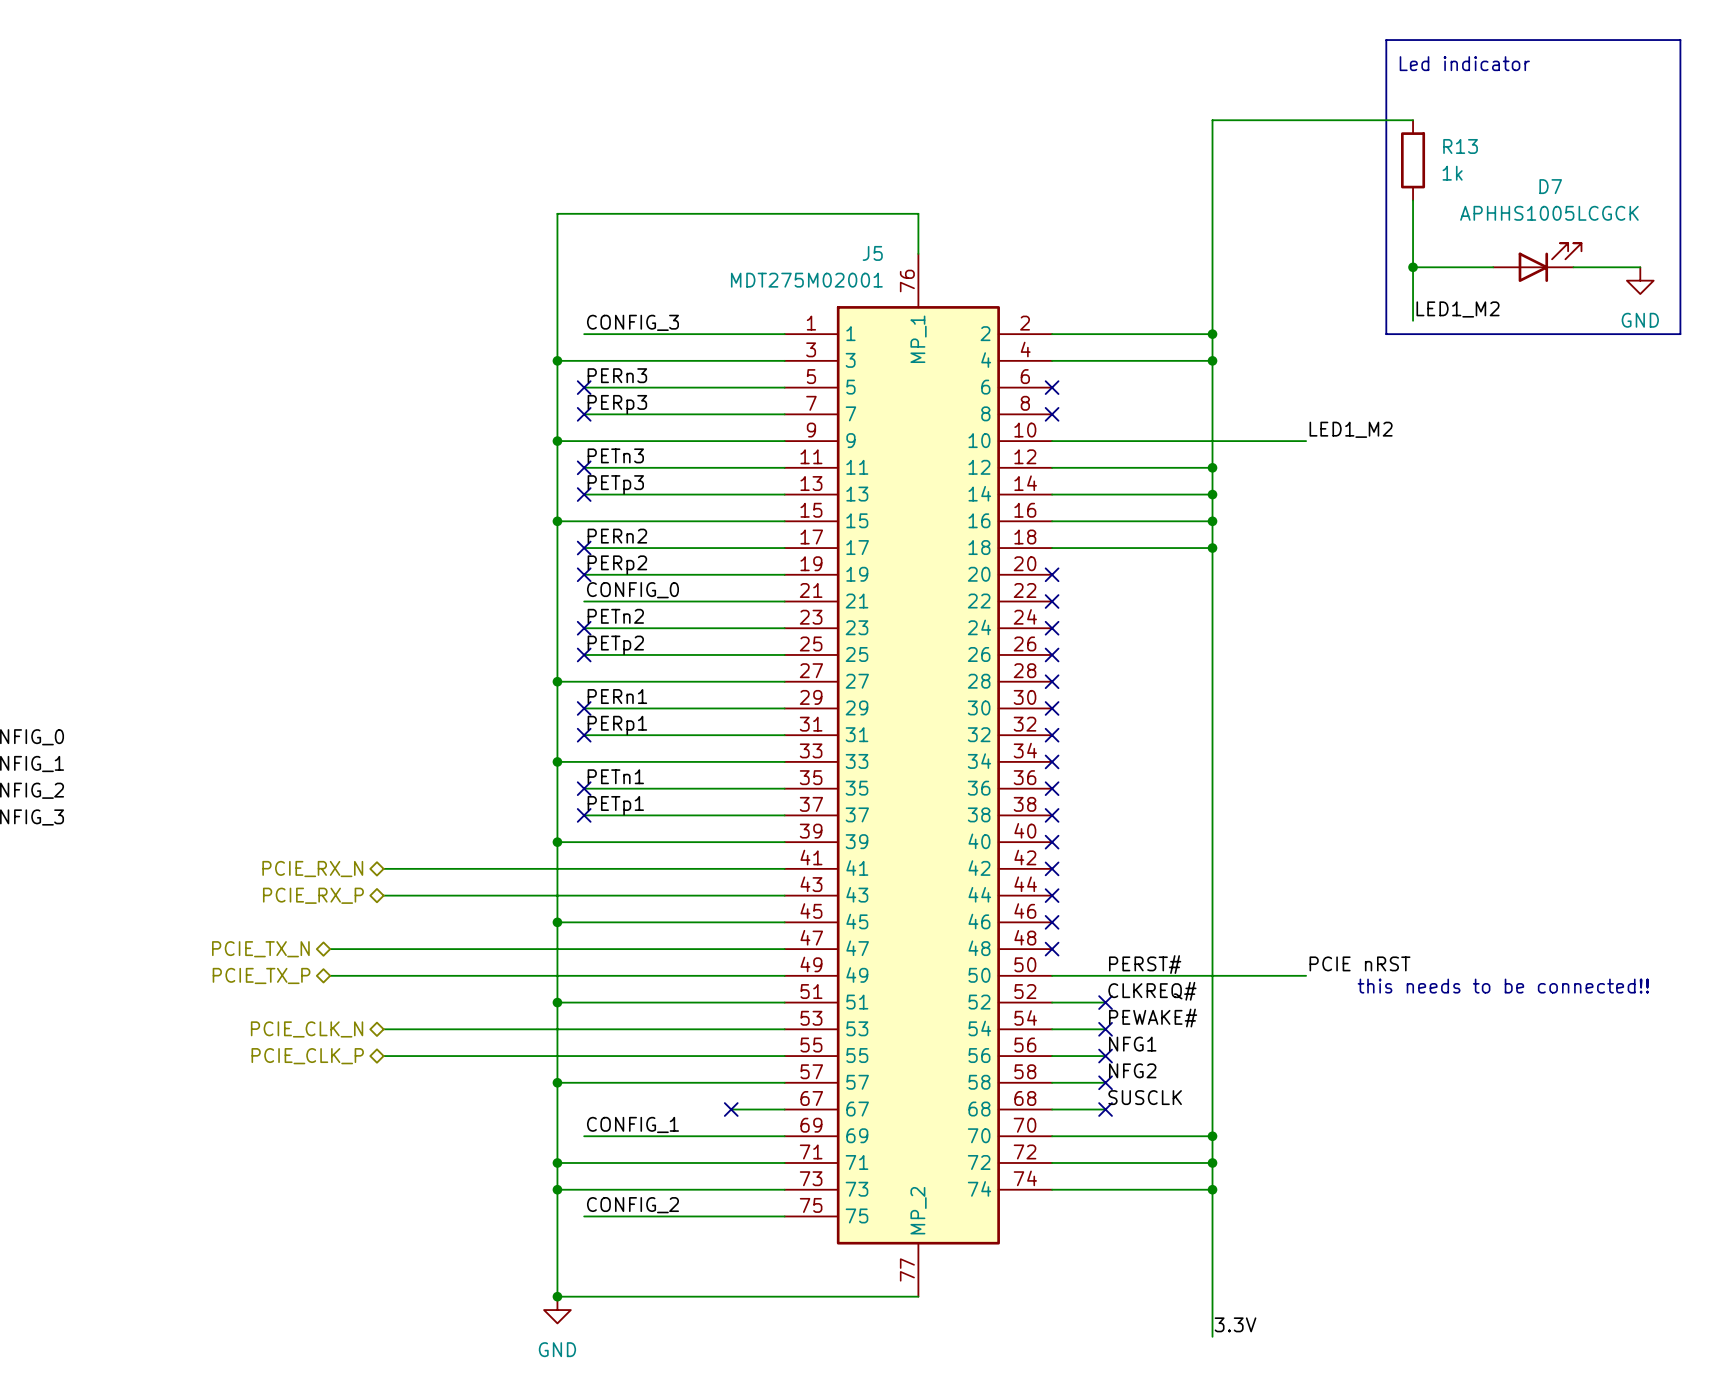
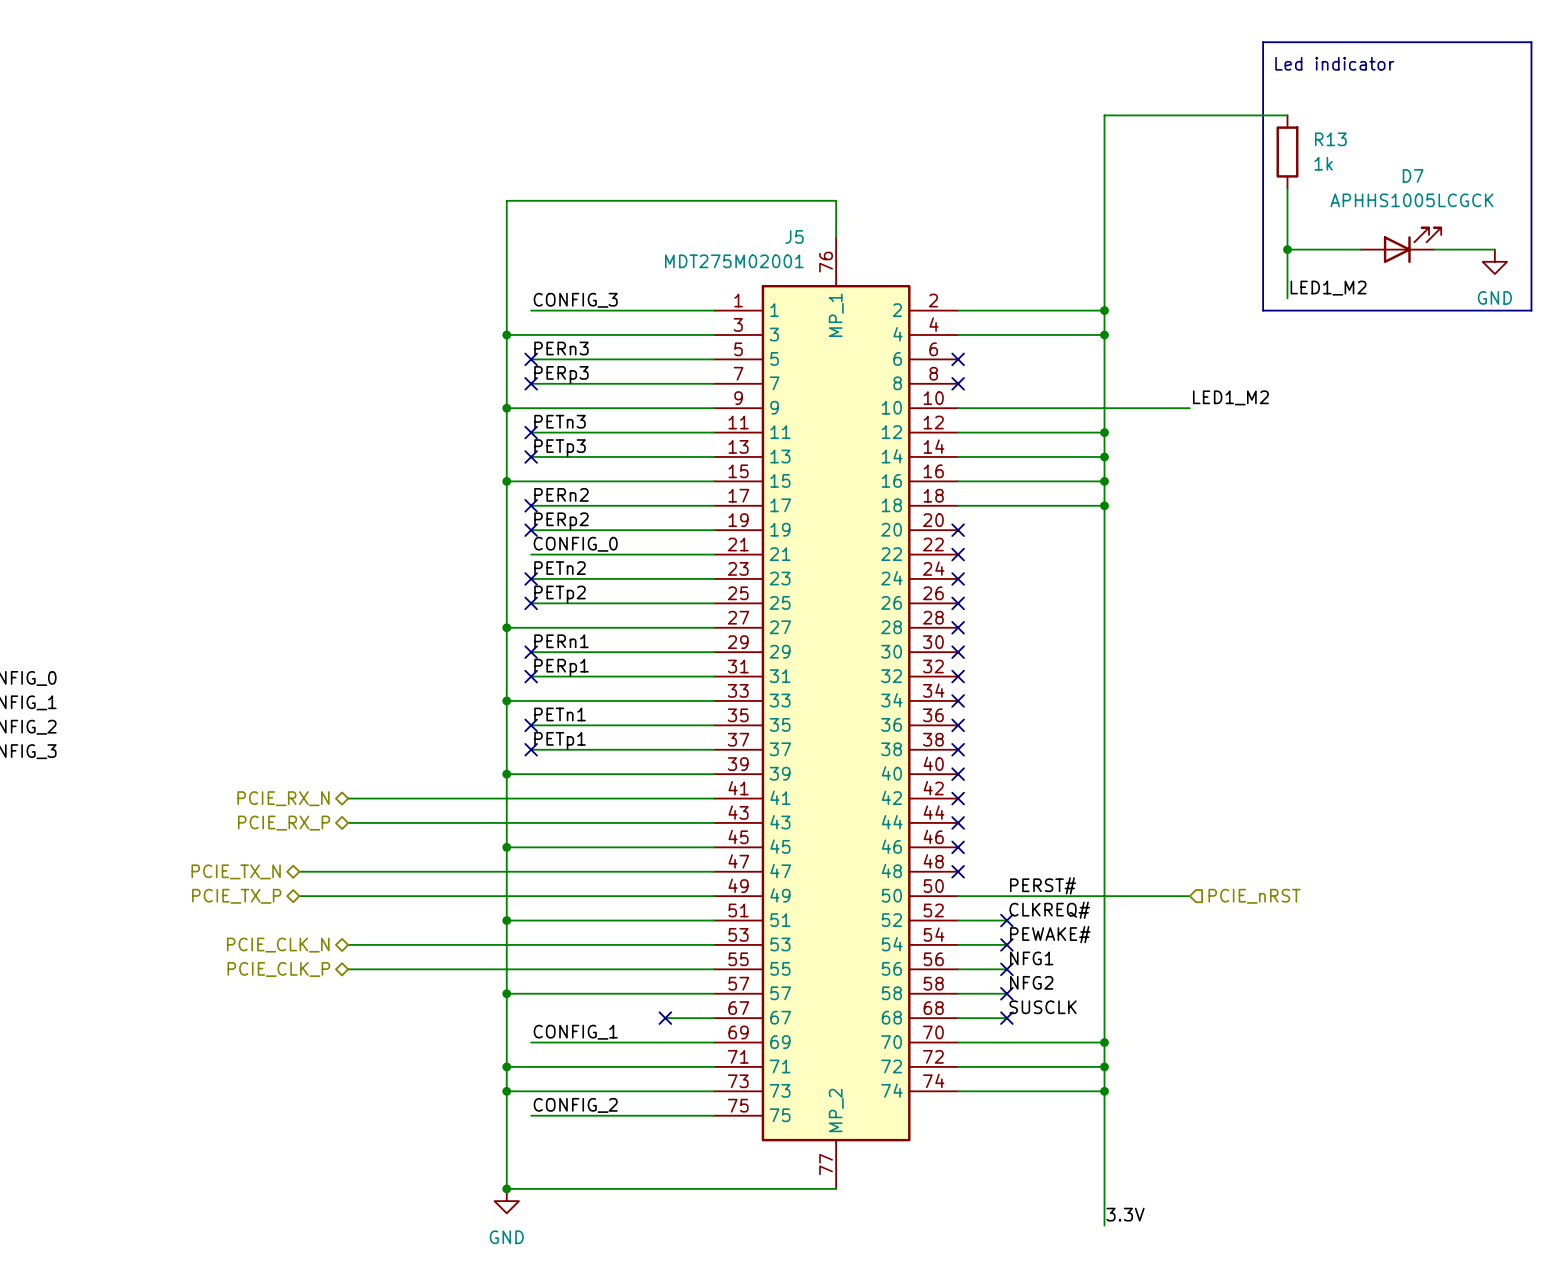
label: PCIE nRST (1359, 963) -> none
hierarchical label: none -> PCIE_nRST (1254, 896)
text: this needs to be connected!! (1503, 986) -> none

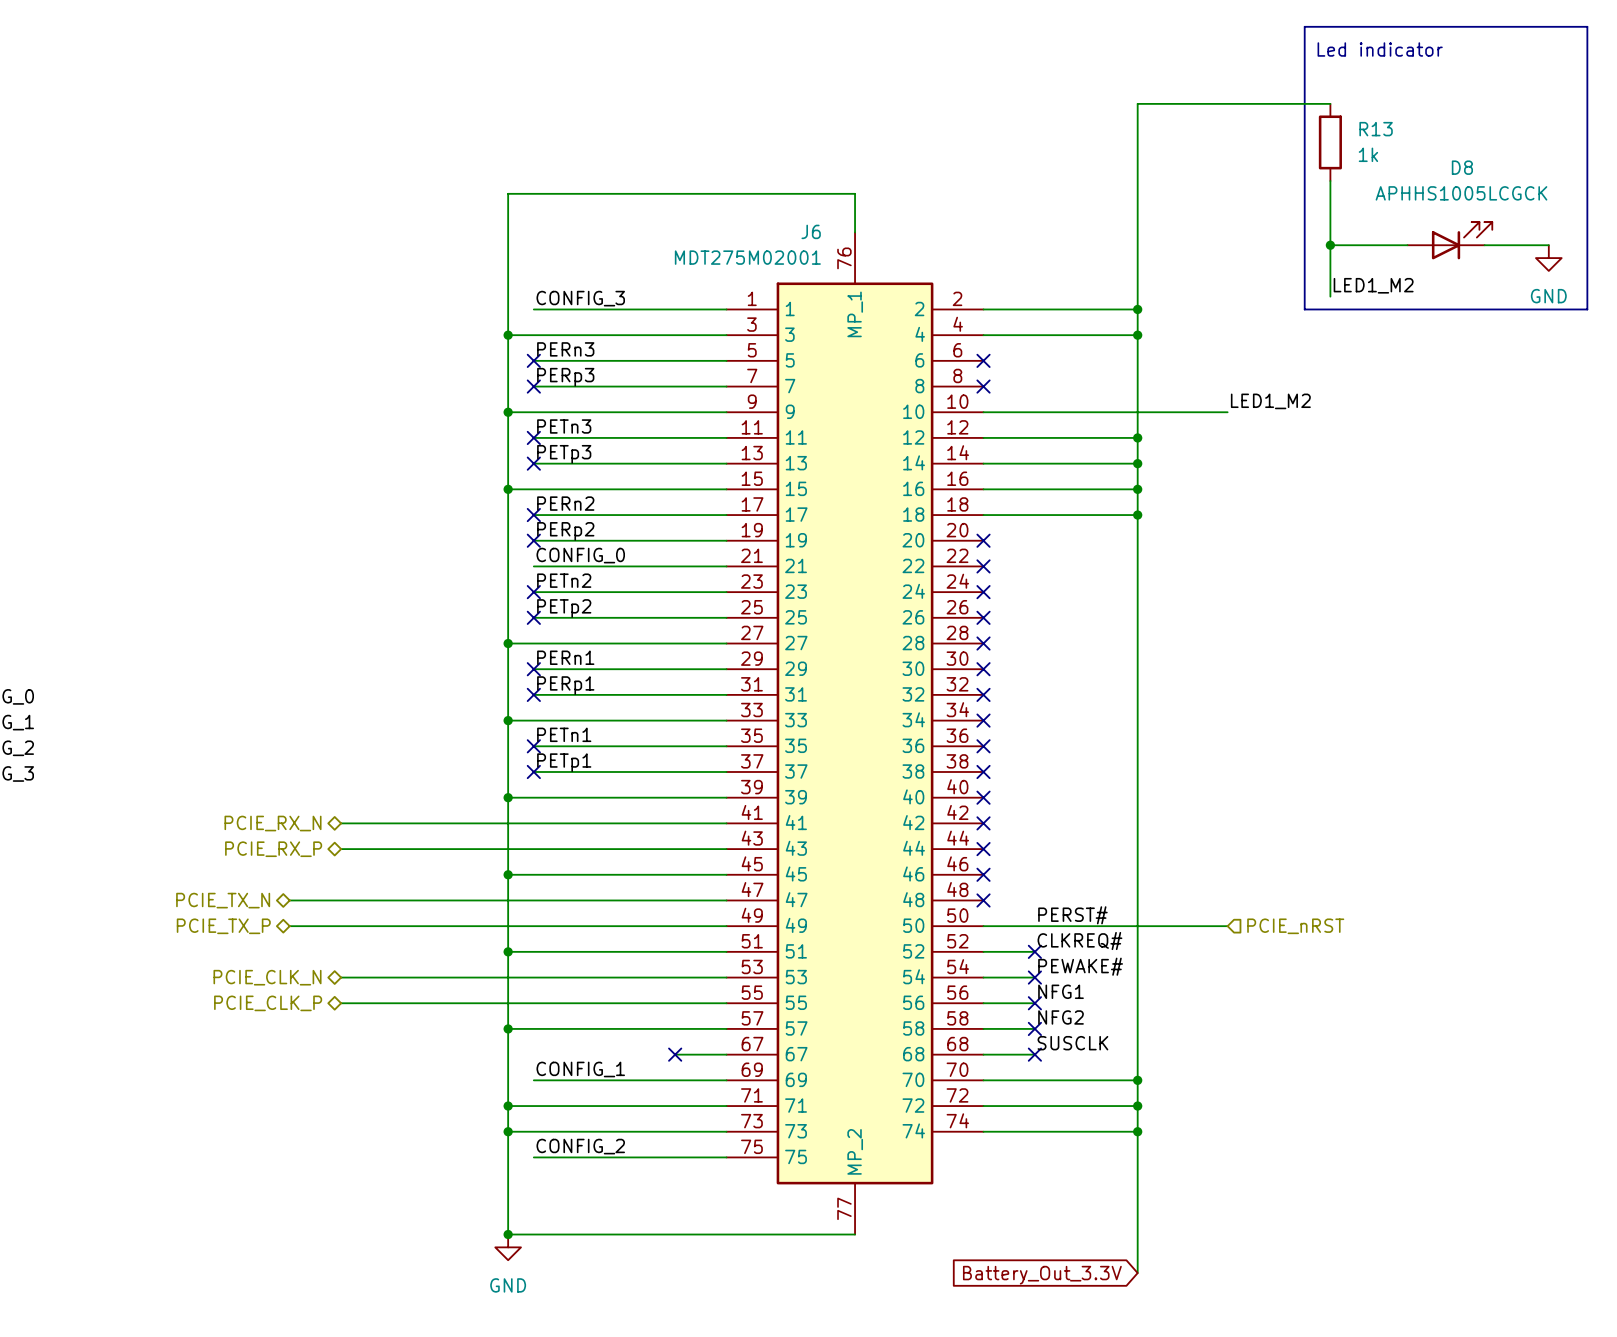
D7 name: D7 (1413, 175) -> D8 (1462, 167)
J5 name: J5 (794, 236) -> J6 (811, 231)
label: 3.3V (1125, 1214) -> none
global label: none -> Battery_Out_3.3V (1042, 1275)

